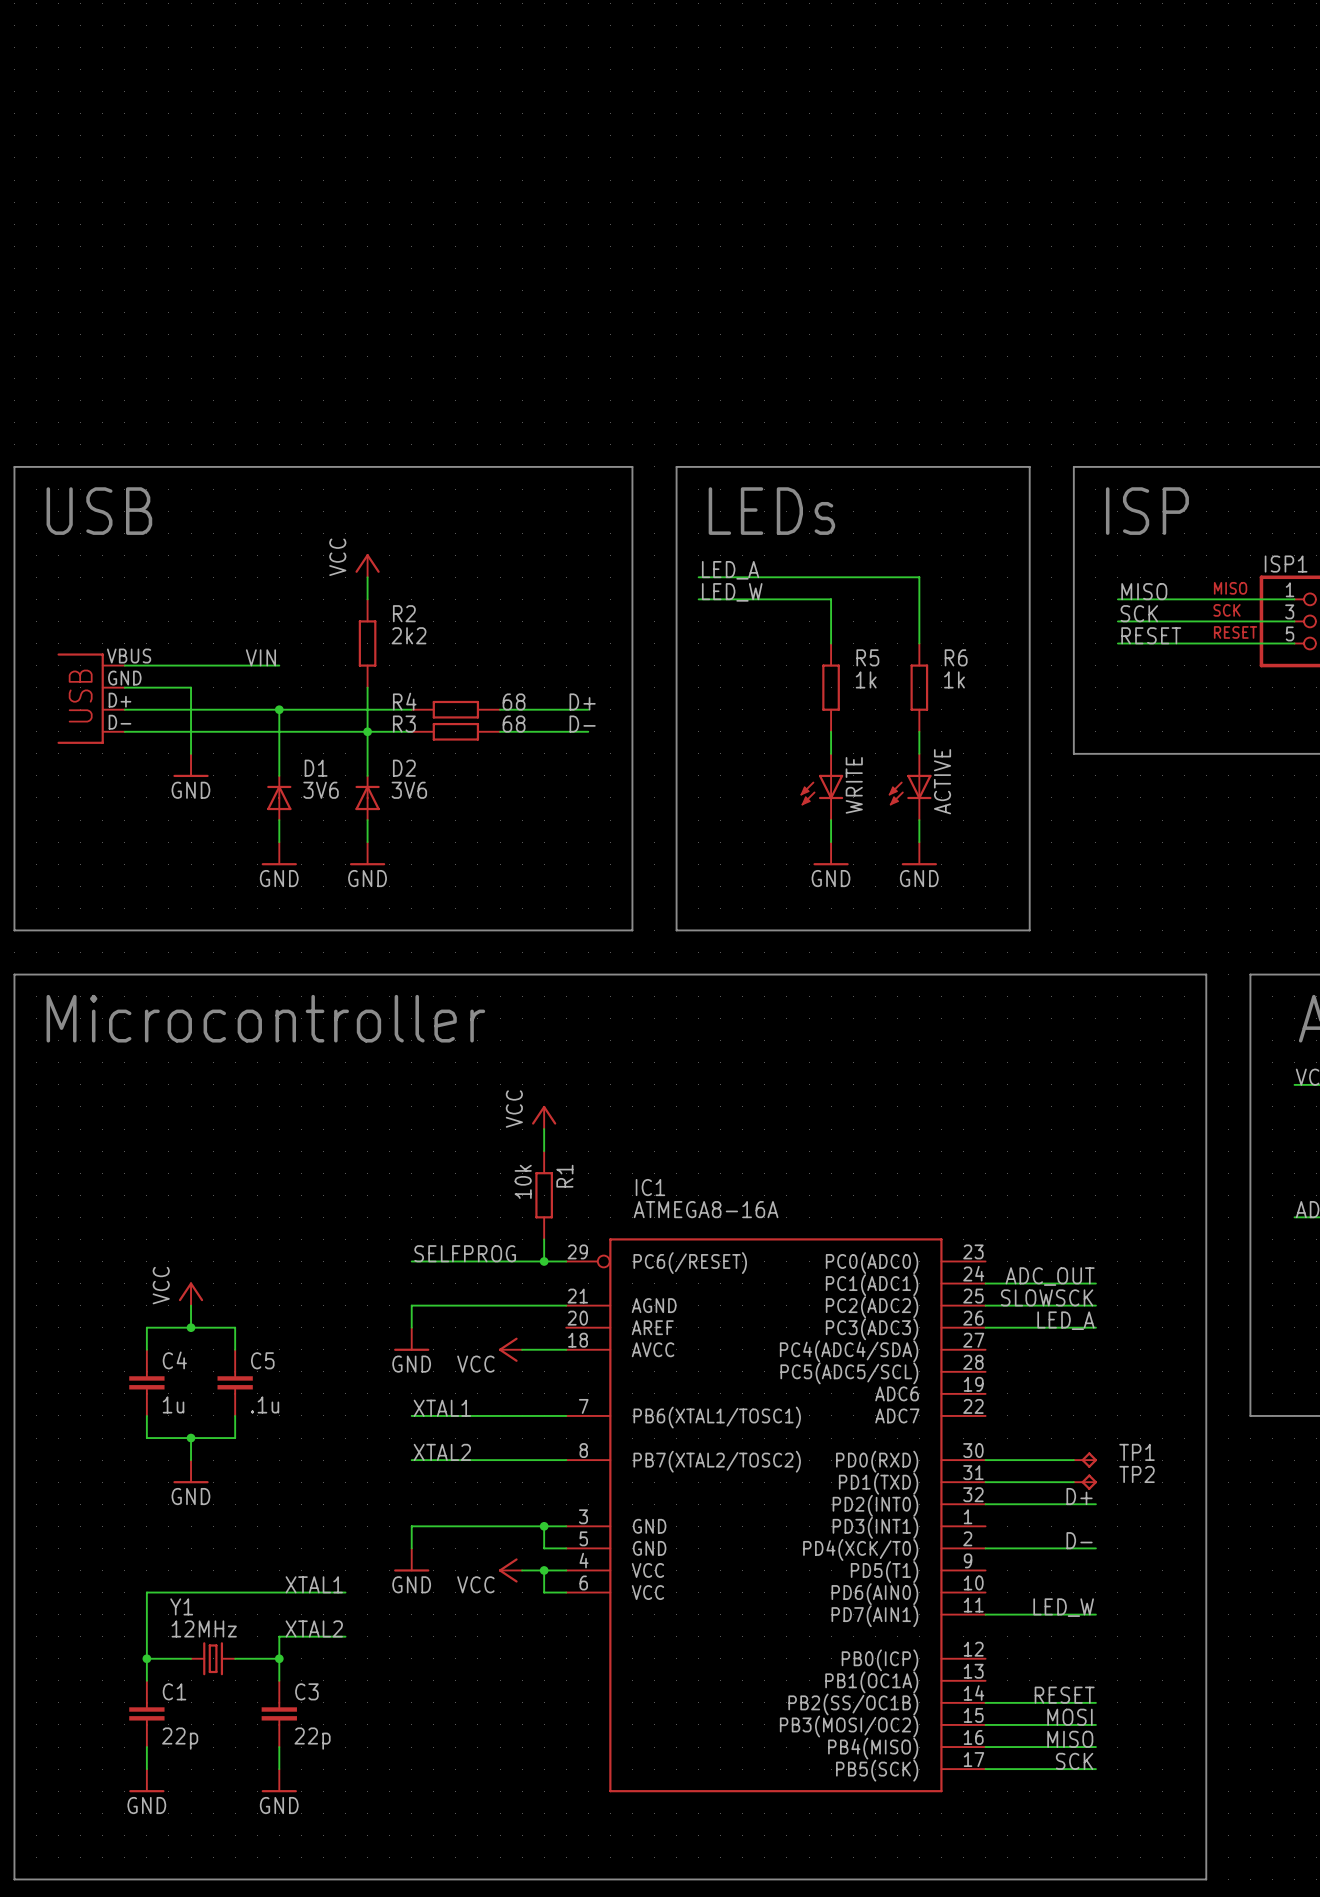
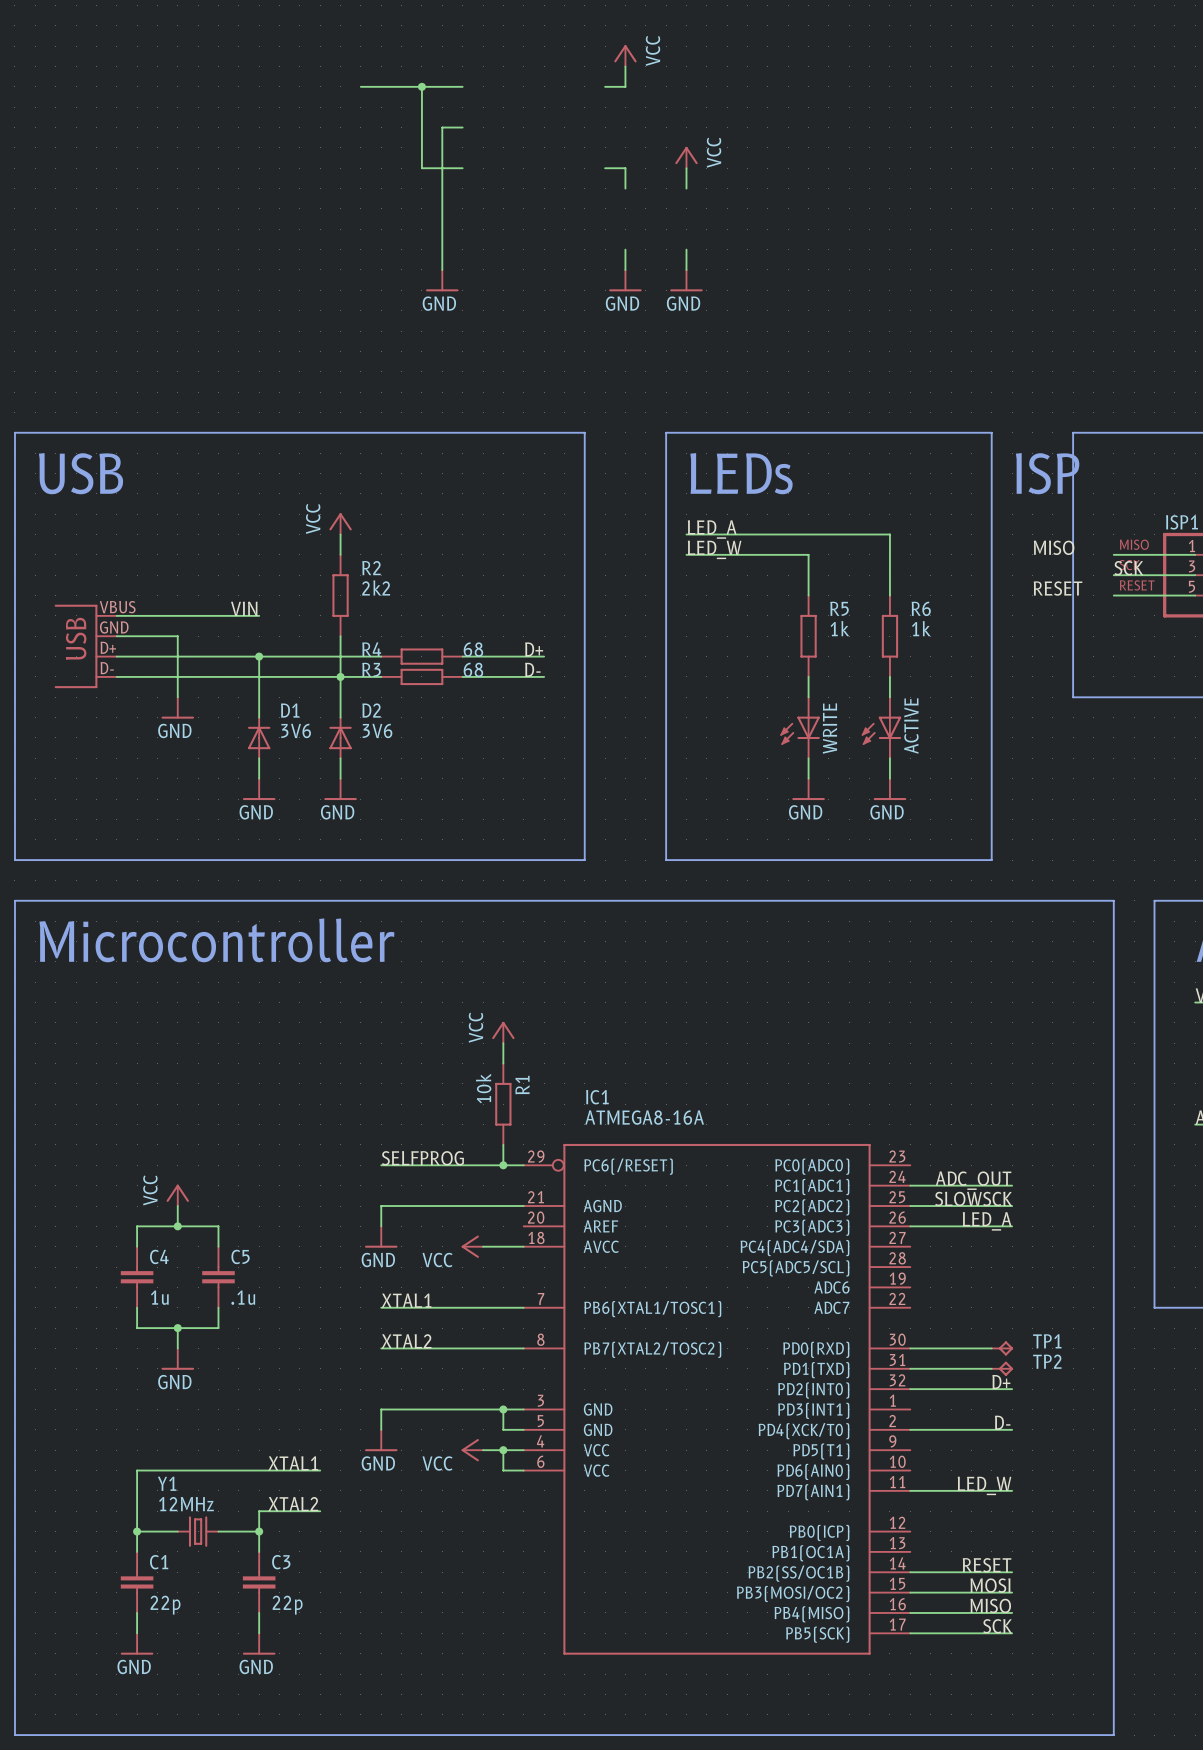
power symbol: none -> VCC (625, 55)
wire: none -> (625, 66) (625, 86) (605, 86)
wire: none -> (360, 86) (462, 86)
wire: none -> (421, 86) (421, 168) (462, 168)
junction: none -> (421, 86)
wire: none -> (462, 127) (442, 127) (442, 269)
power symbol: none -> VCC (686, 157)
wire: none -> (605, 168) (625, 168) (625, 188)
wire: none -> (686, 168) (686, 188)
wire: none -> (625, 249) (625, 269)
wire: none -> (686, 249) (686, 269)
power symbol: none -> GND (442, 280)
power symbol: none -> GND (625, 280)
power symbol: none -> GND (686, 280)
line: (720, 466) (676, 466) (676, 930) (720, 930) -> (666, 432) (666, 860)
line: (1029, 466) (1029, 930) -> none
line: (1073, 466) (1162, 466) -> (991, 432) (951, 432)
line: none -> (1073, 432) (1073, 697)
text position: LEDs (771, 511) -> LEDs (741, 473)
label position: LED_A (730, 570) -> LED_A (712, 529)
wire: (698, 577) (742, 577) -> none
wire: (919, 577) (919, 643) -> (849, 534) (889, 534) (889, 595)
label position: LED_W (732, 592) -> LED_W (714, 549)
wire: (698, 599) (742, 599) -> none
wire: (831, 599) (831, 643) -> (767, 554) (808, 554) (808, 595)
wire: (1117, 599) (1206, 599) -> none
label position: SCK (1139, 613) -> SCK (1128, 568)
wire: (1117, 621) (1206, 621) -> none
wire: (1117, 643) (1206, 643) -> none
R5 position: (831, 687) -> (808, 636)
R6 position: (919, 687) -> (889, 636)
wire: (831, 731) (831, 753) -> (889, 676) (889, 697)
wire: (919, 731) (919, 753) -> (808, 676) (808, 697)
line: (1073, 753) (1162, 753) -> (991, 697) (991, 860) (951, 860)
WRITE position: (821, 786) -> (800, 727)
ACTIVE position: (910, 786) -> (881, 727)
wire: (831, 820) (831, 842) -> (889, 758) (889, 778)
wire: (919, 820) (919, 842) -> (808, 758) (808, 778)
power symbol: GND (831, 853) -> none
power symbol: none -> GND (808, 789)
power symbol: GND (919, 853) -> none
power symbol: none -> GND (889, 789)

